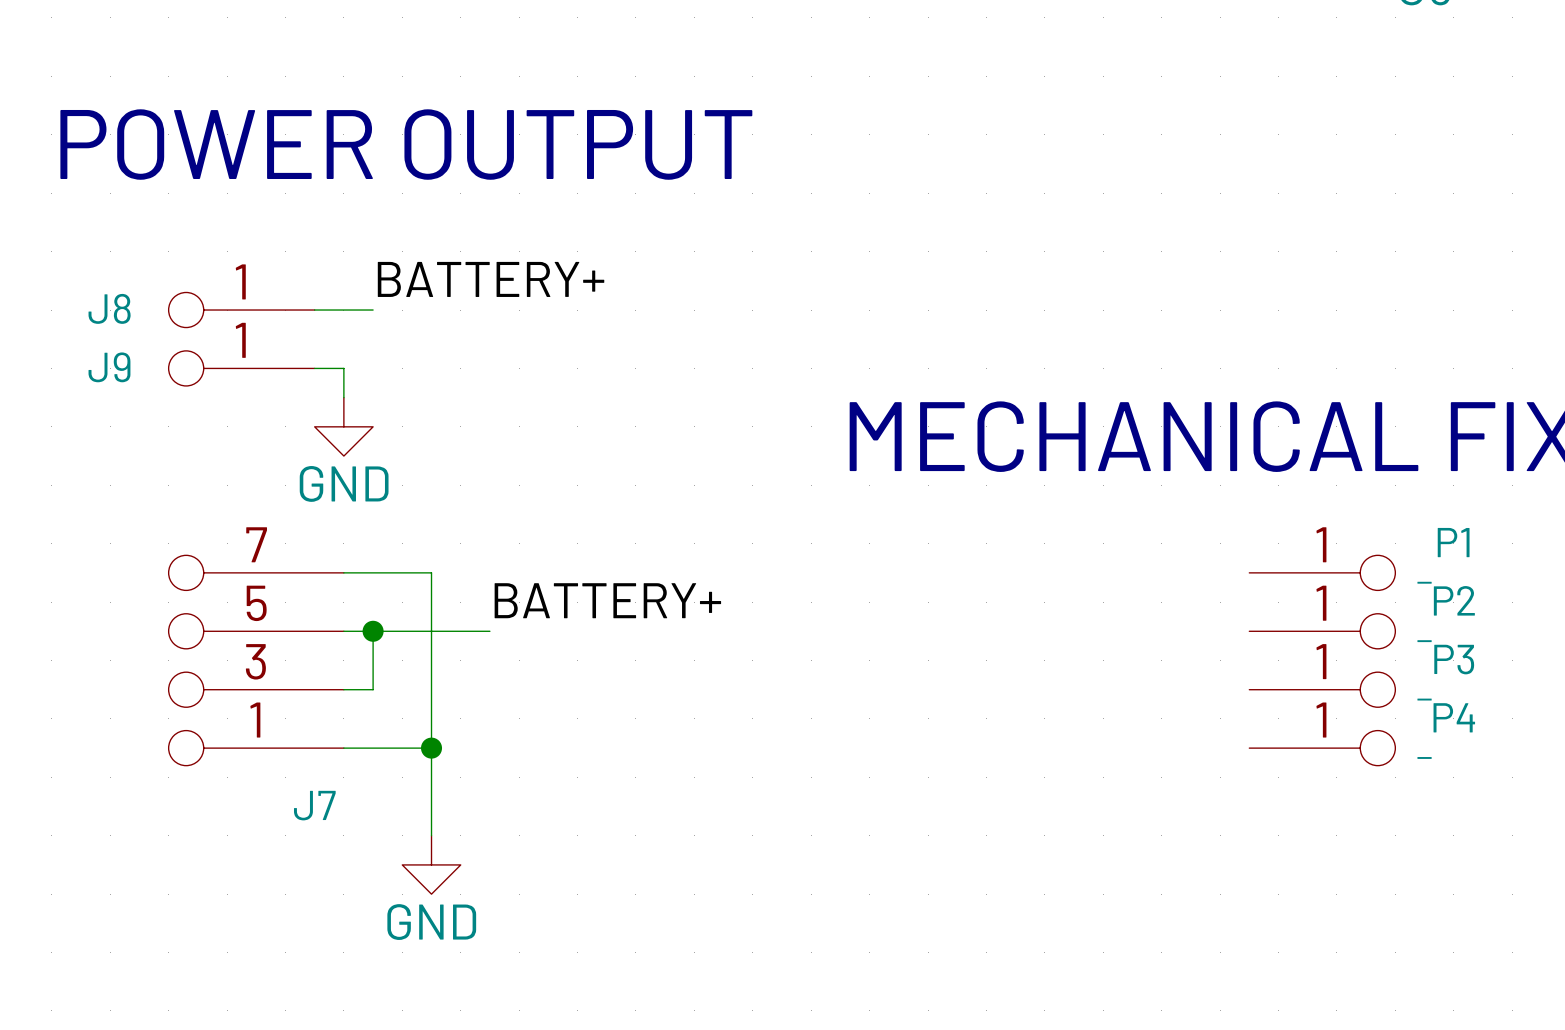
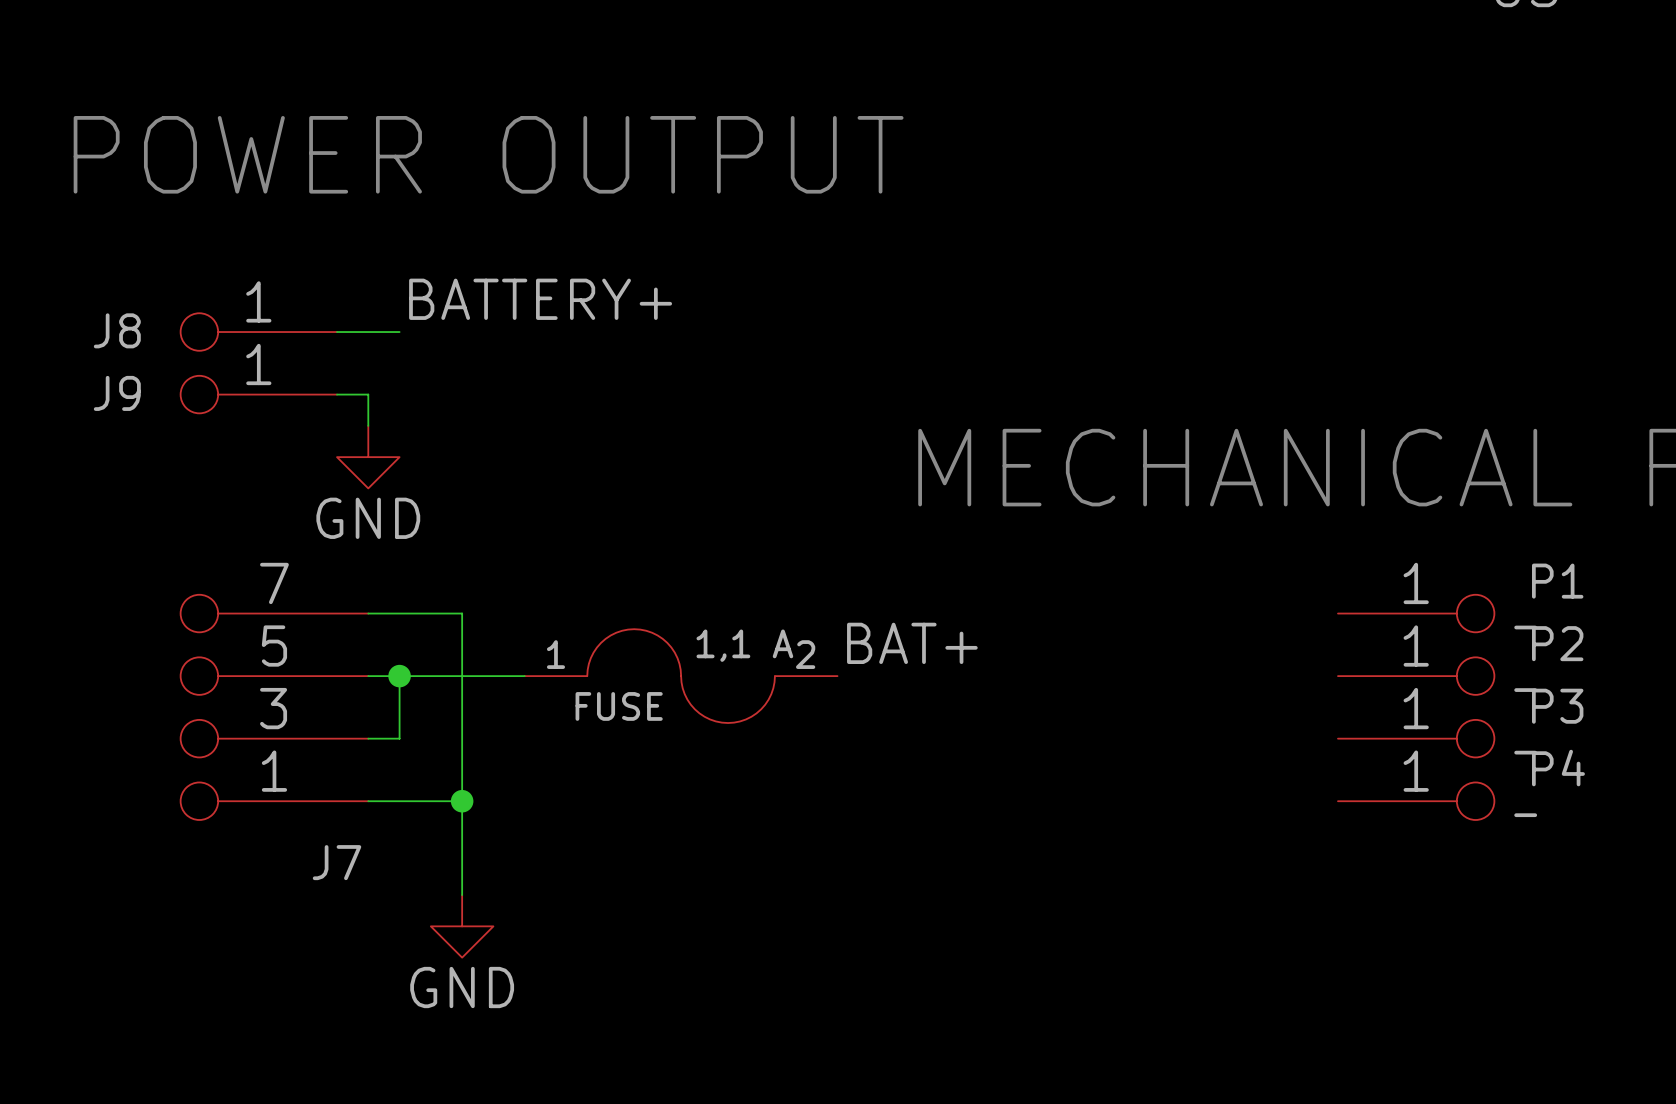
label: BATTERY+ (607, 600) -> BAT+ (912, 643)
1,1 A: none -> FUSE (681, 676)

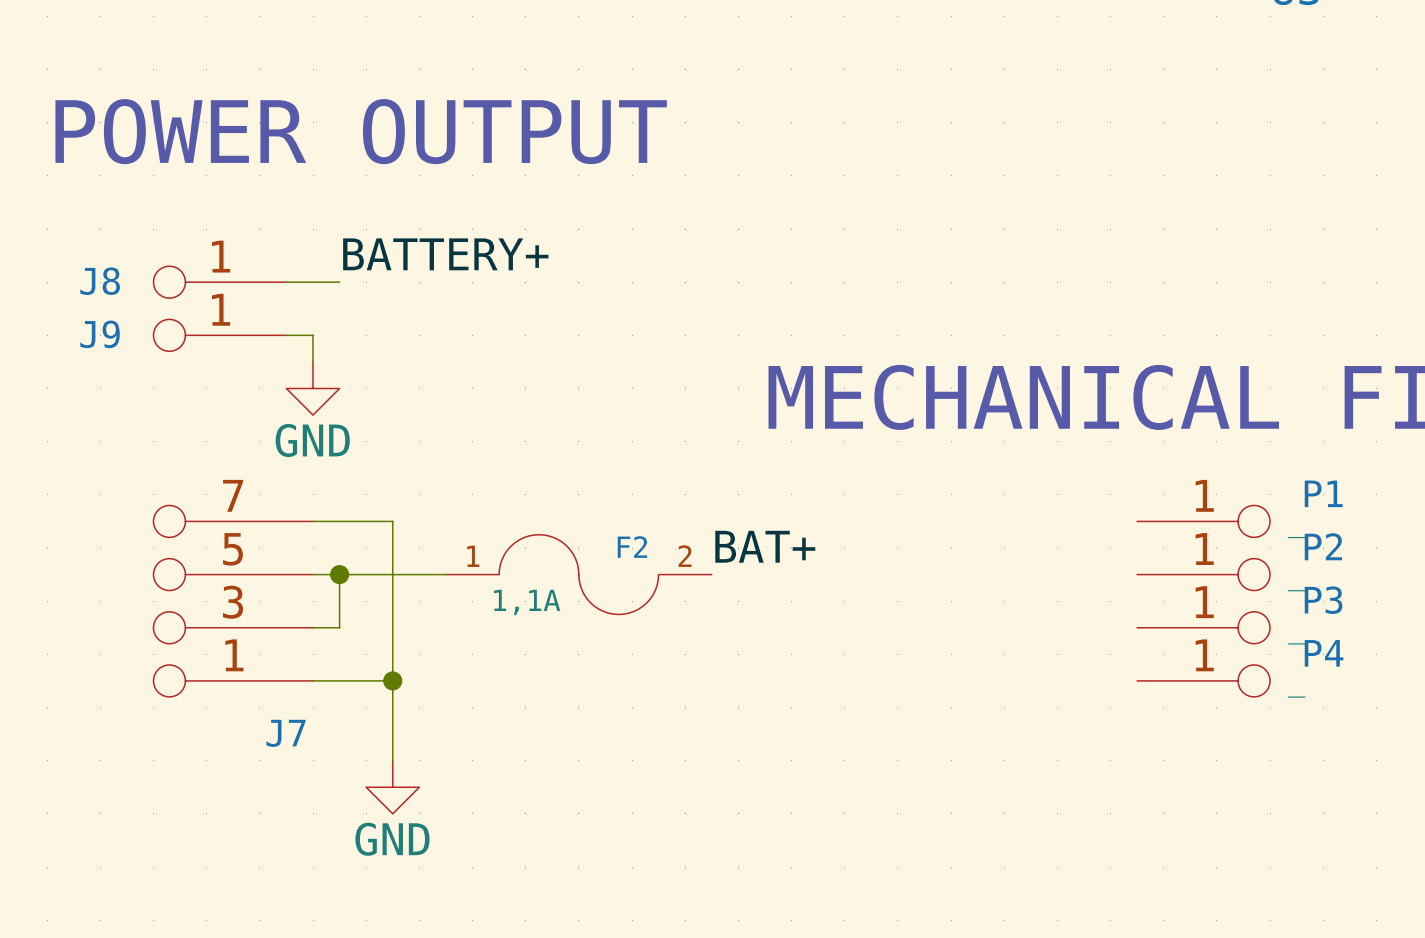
1,1 A name: 1,1 A (744, 645) -> F2 (632, 547)
1,1 A value: FUSE (619, 706) -> 1,1A (527, 602)

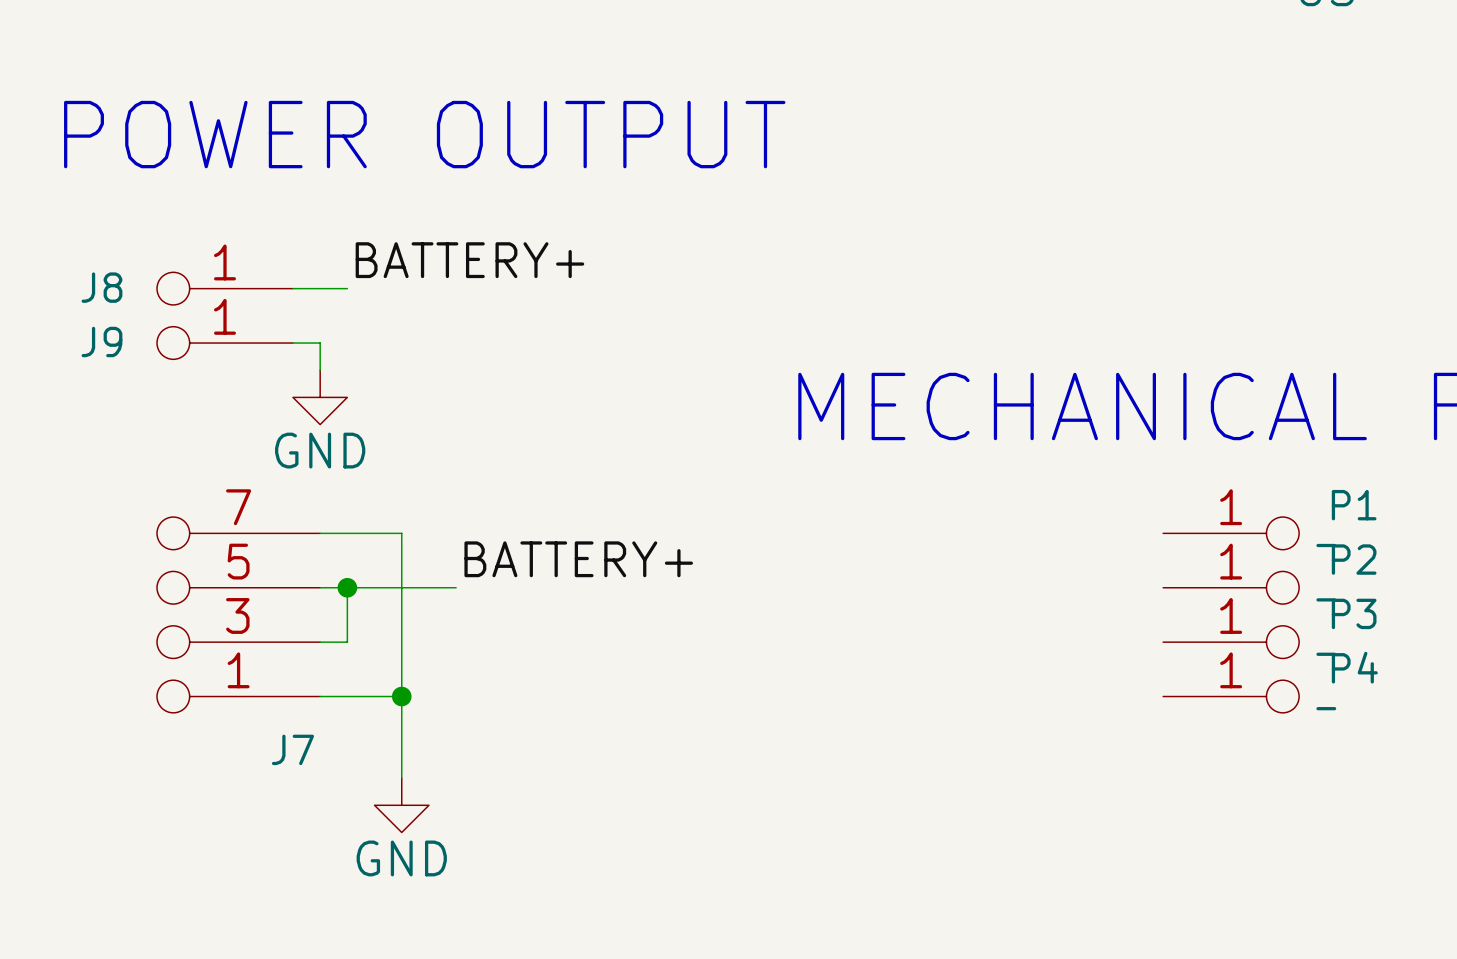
label: BAT+ (765, 546) -> BATTERY+ (578, 559)
F2: 1,1A (578, 574) -> none

